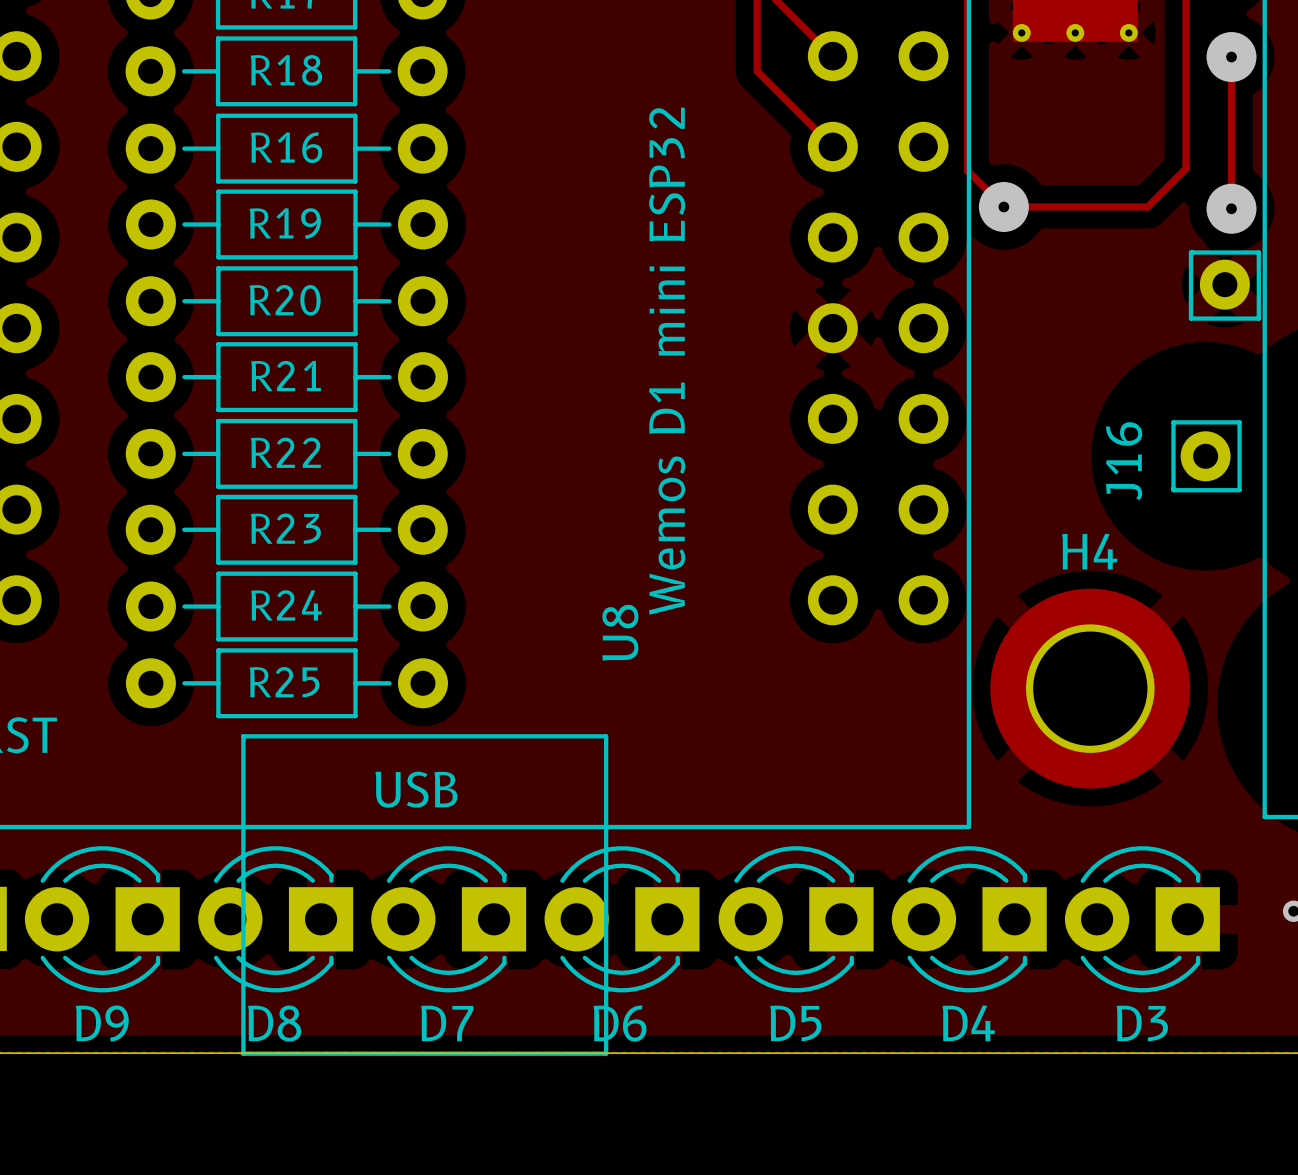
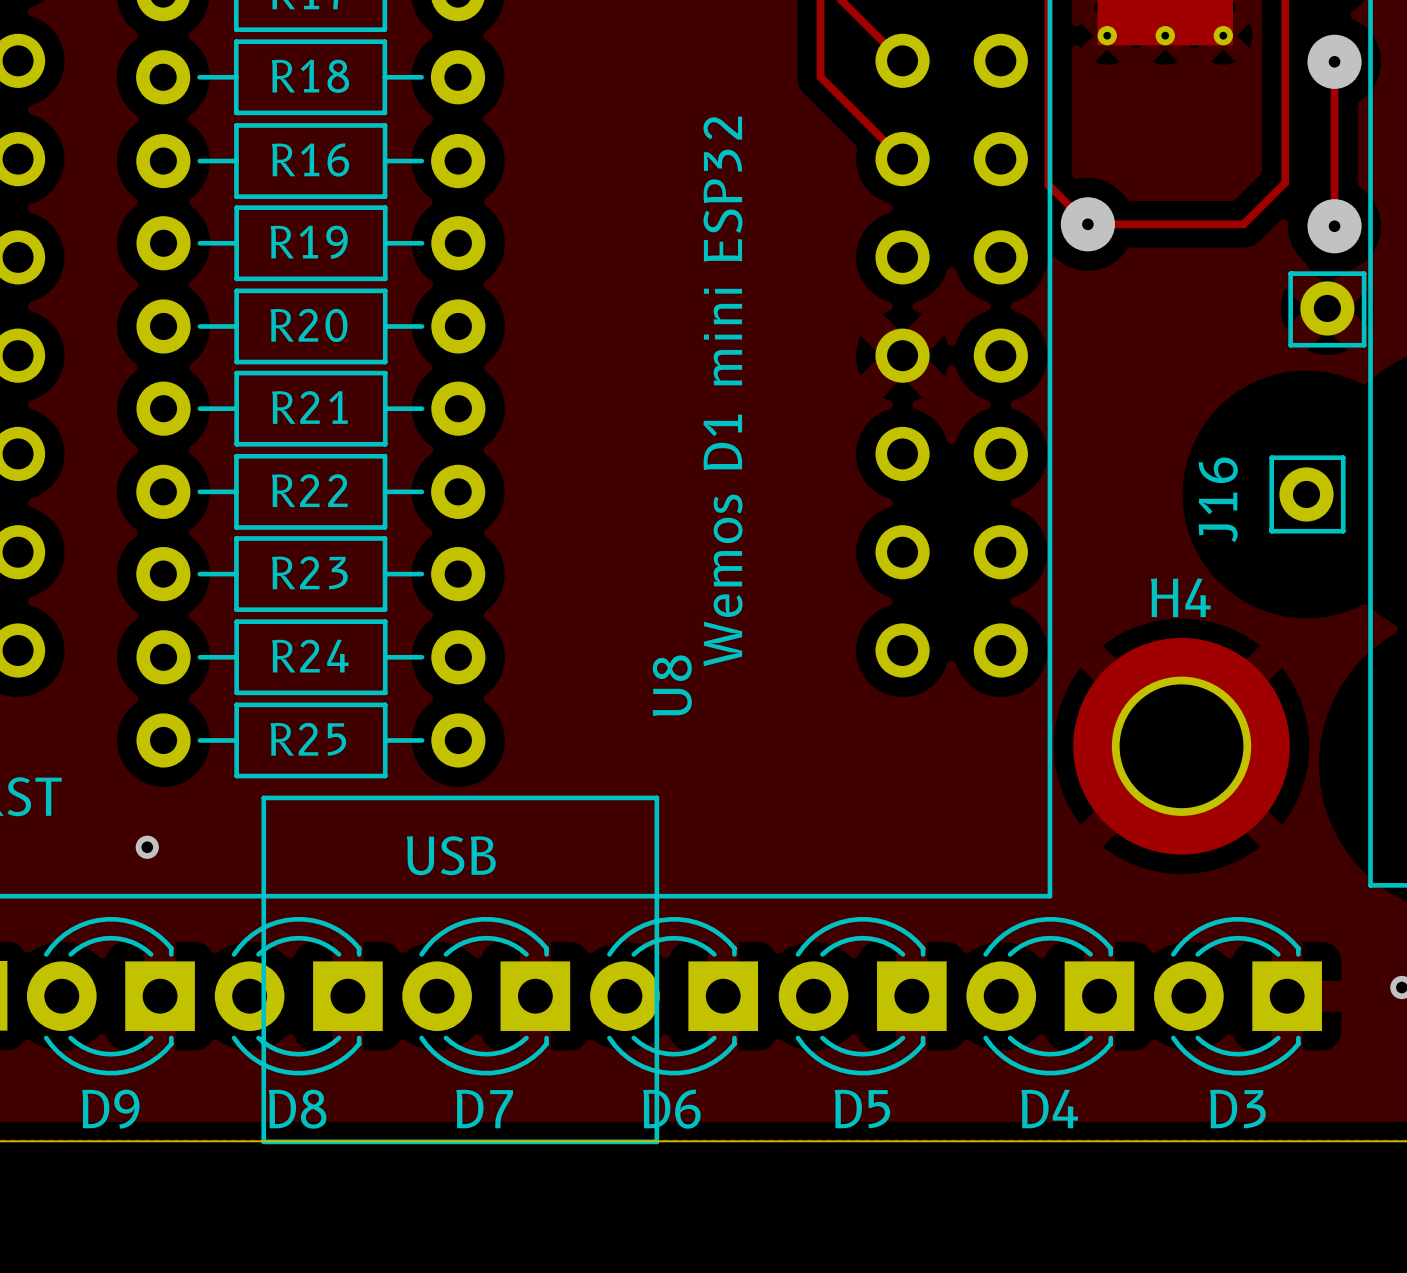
via: none -> (147, 847)

